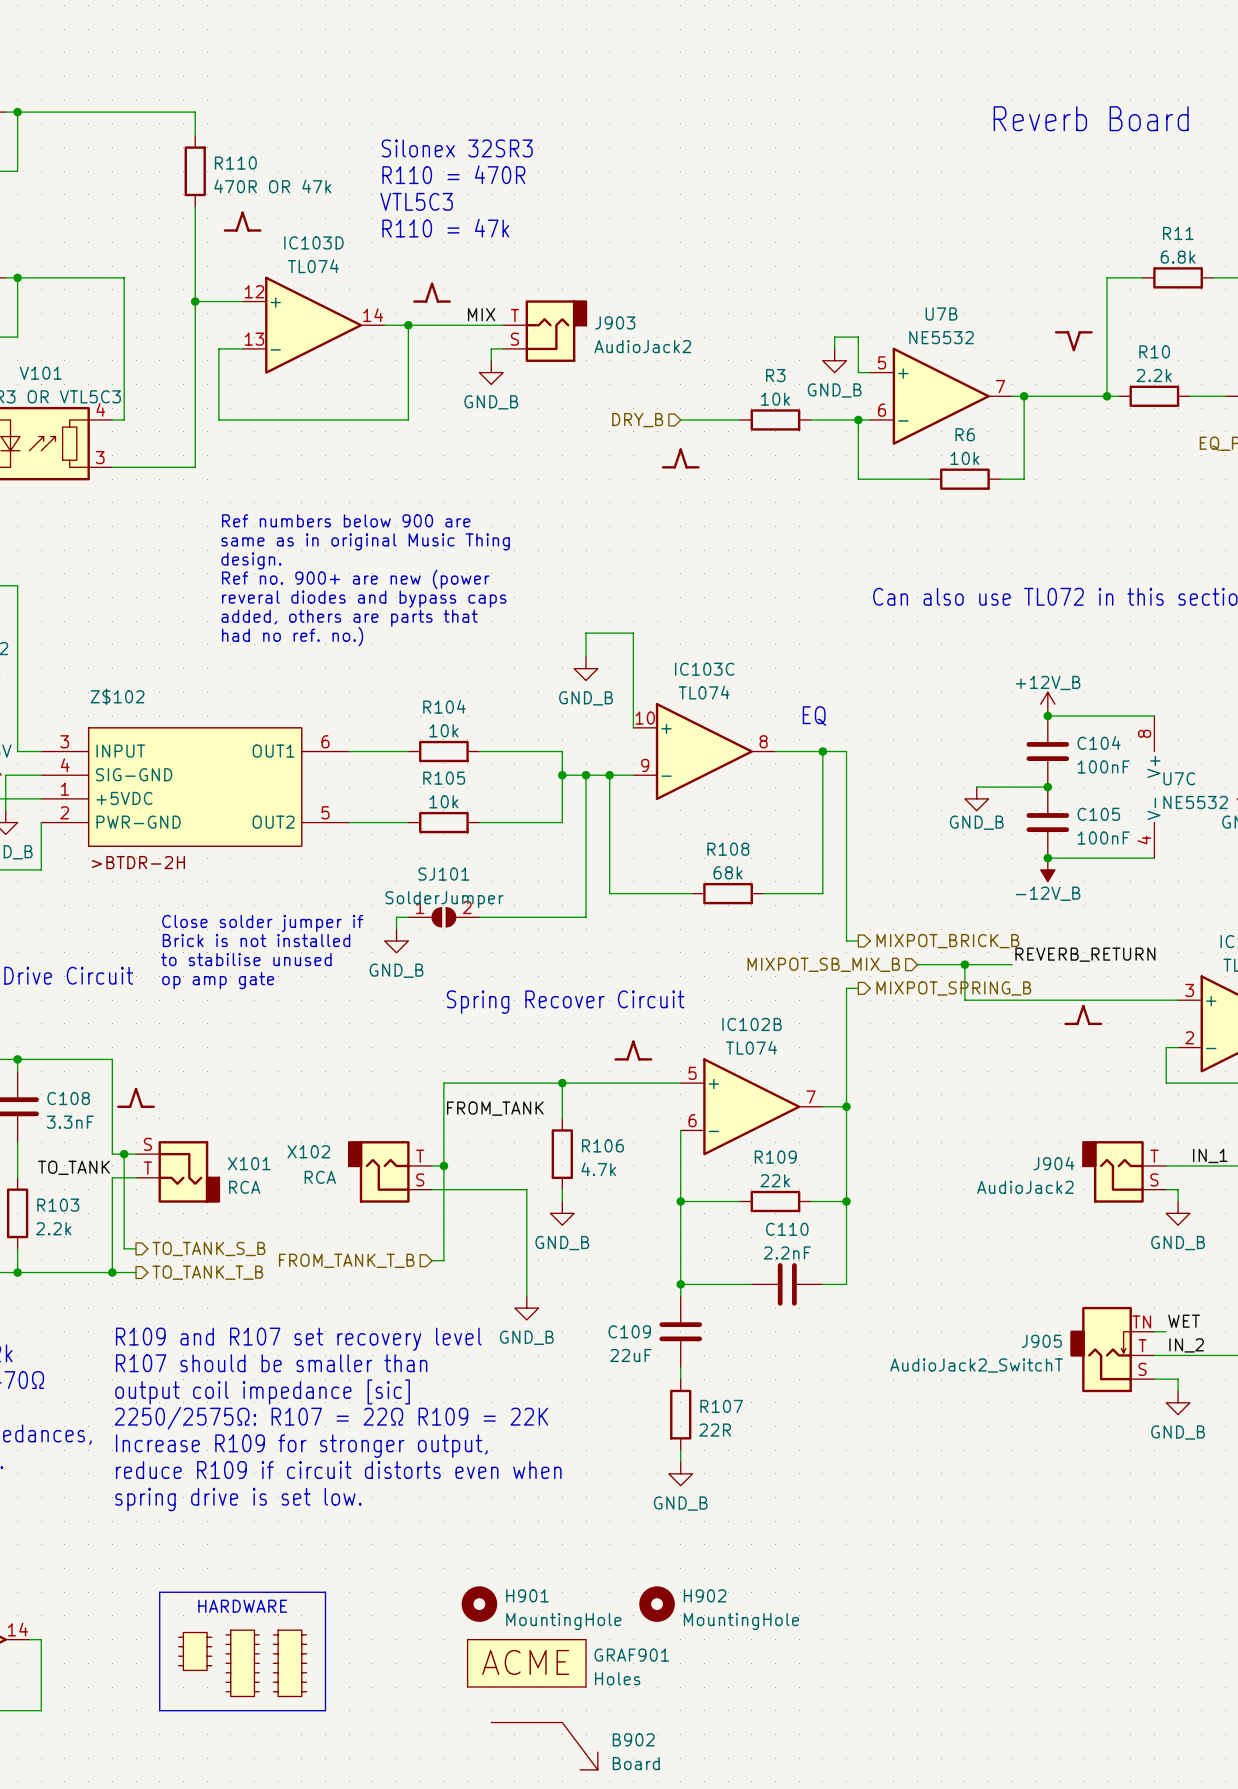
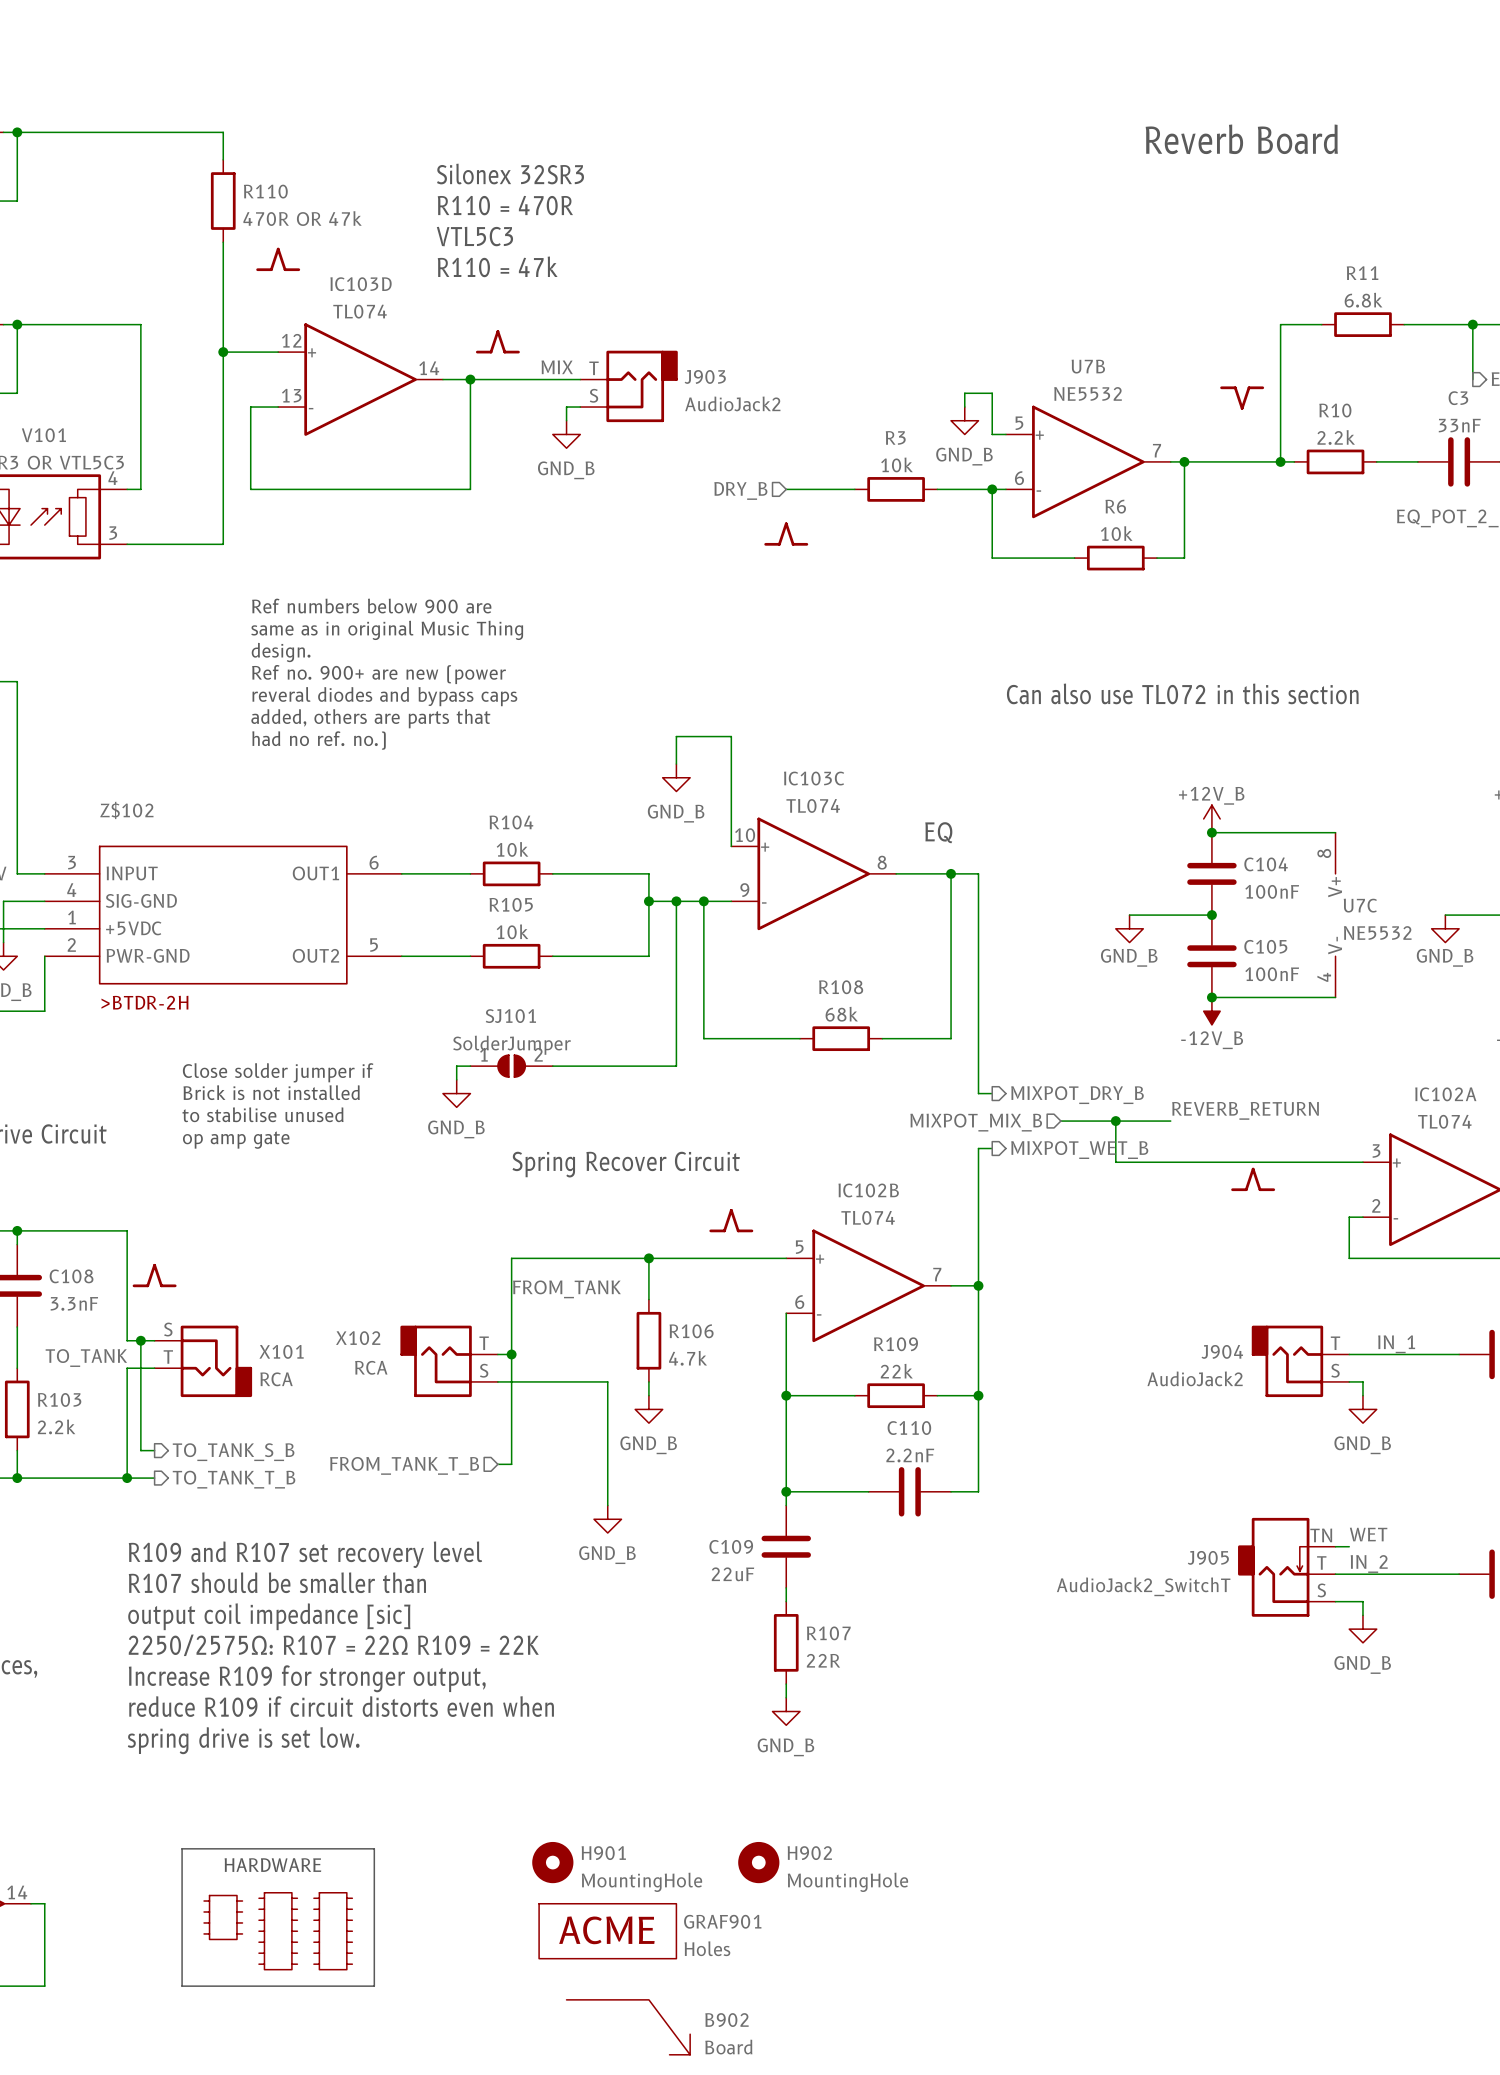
hierarchical label: MIXPOT_BRICK_B (947, 941) -> MIXPOT_DRY_B (1077, 1095)
hierarchical label: MIXPOT_SB_MIX_B (823, 964) -> MIXPOT_MIX_B (976, 1122)
hierarchical label: MIXPOT_SPRING_B (953, 988) -> MIXPOT_WET_B (1079, 1150)

